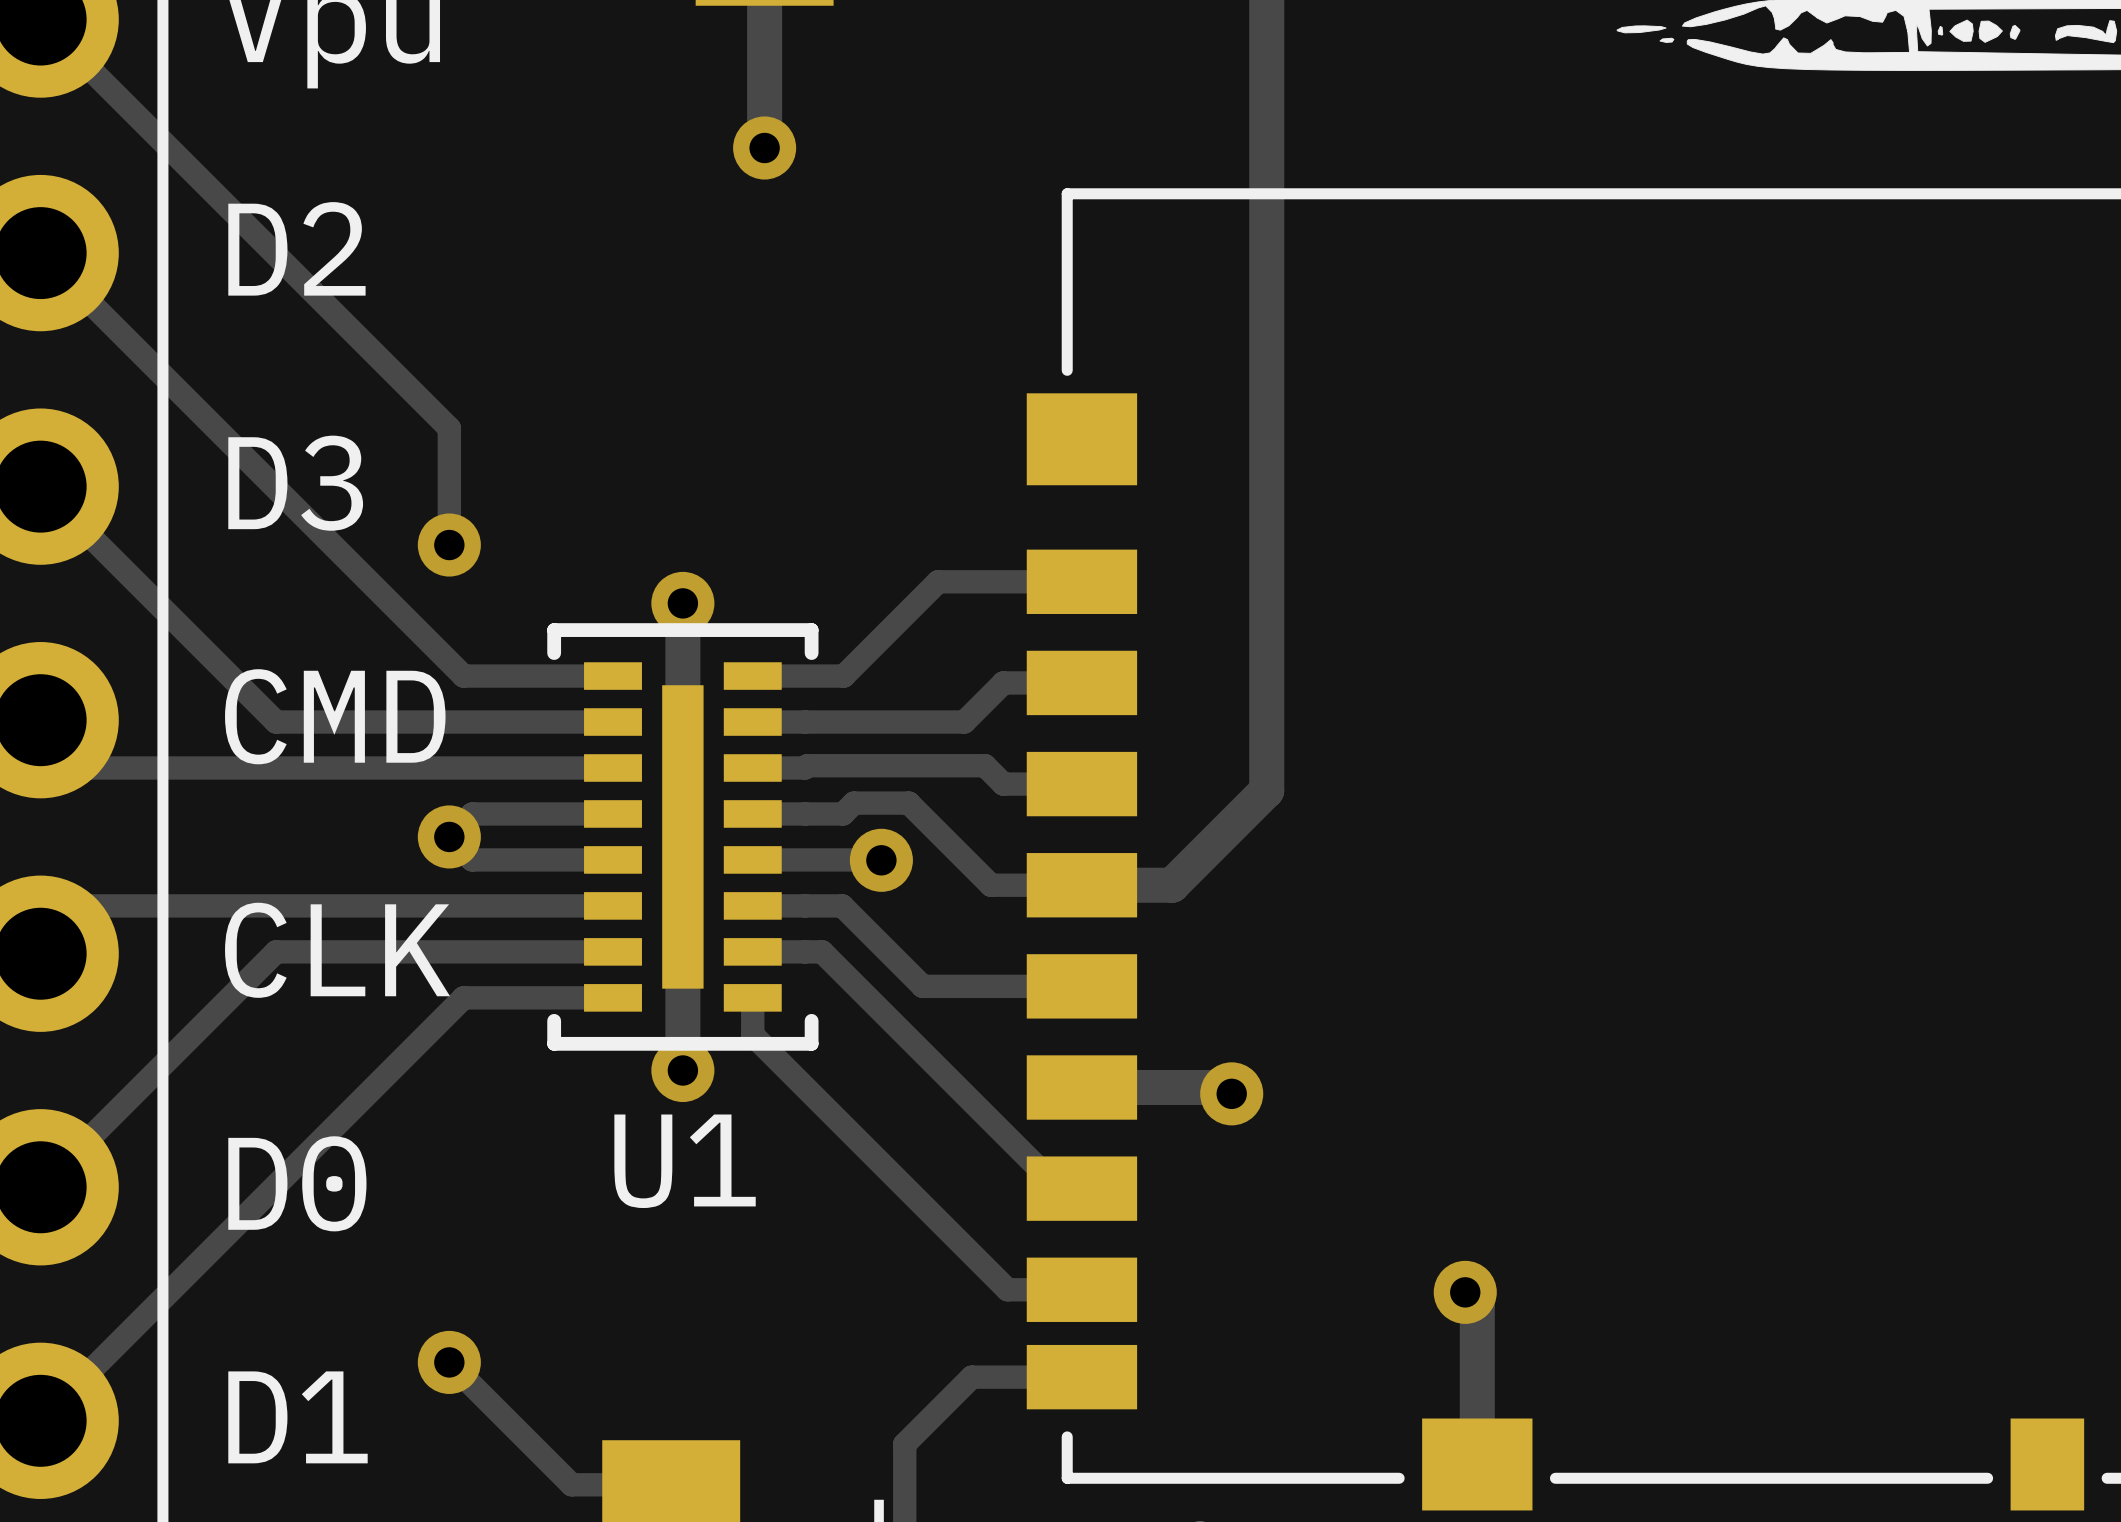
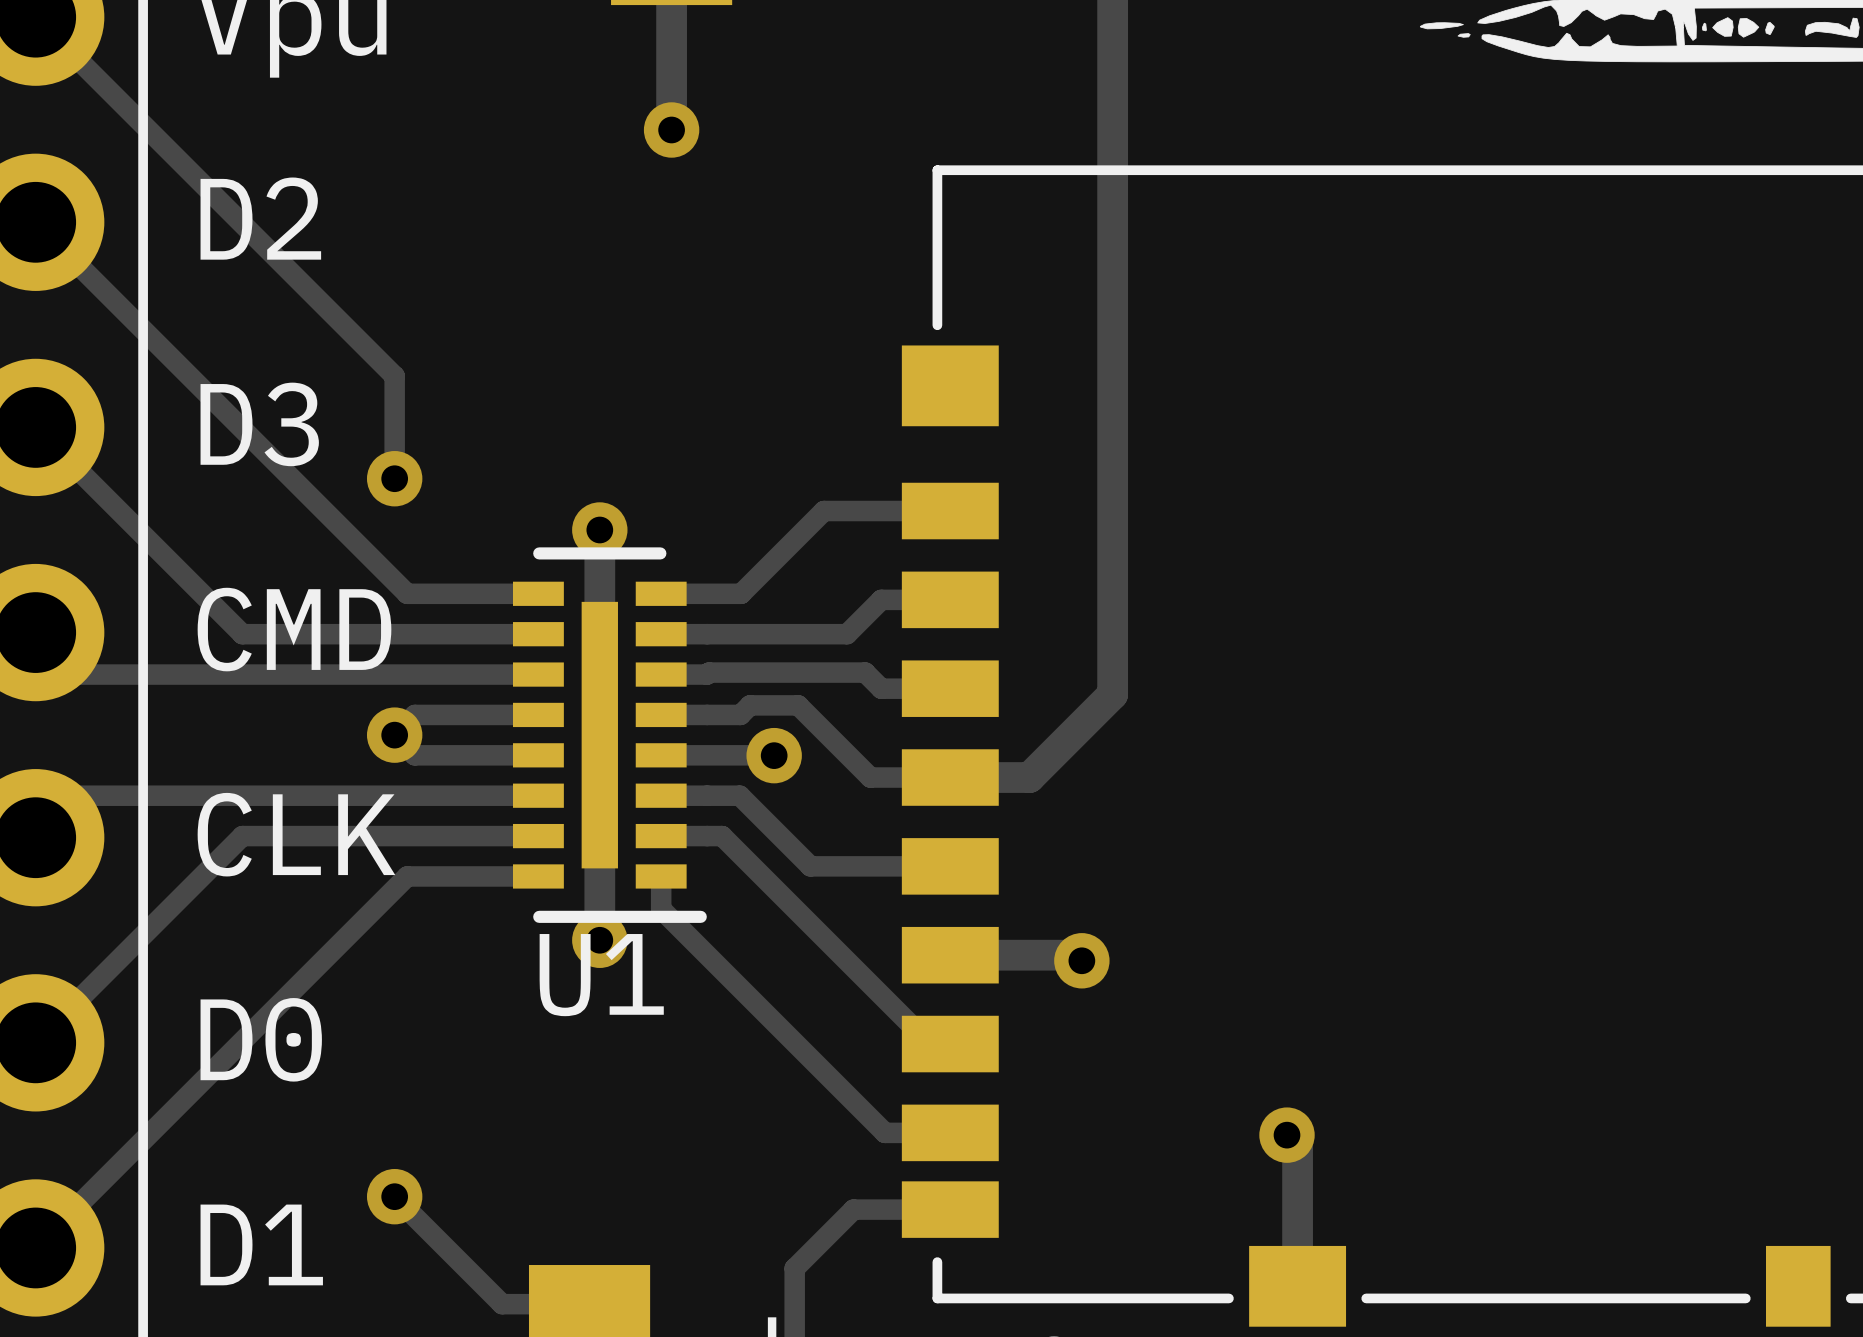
U1 footprint: [547, 623, 819, 1051] -> [512, 547, 707, 923]
U1 name position: U1 (685, 1161) -> U1 (601, 975)

